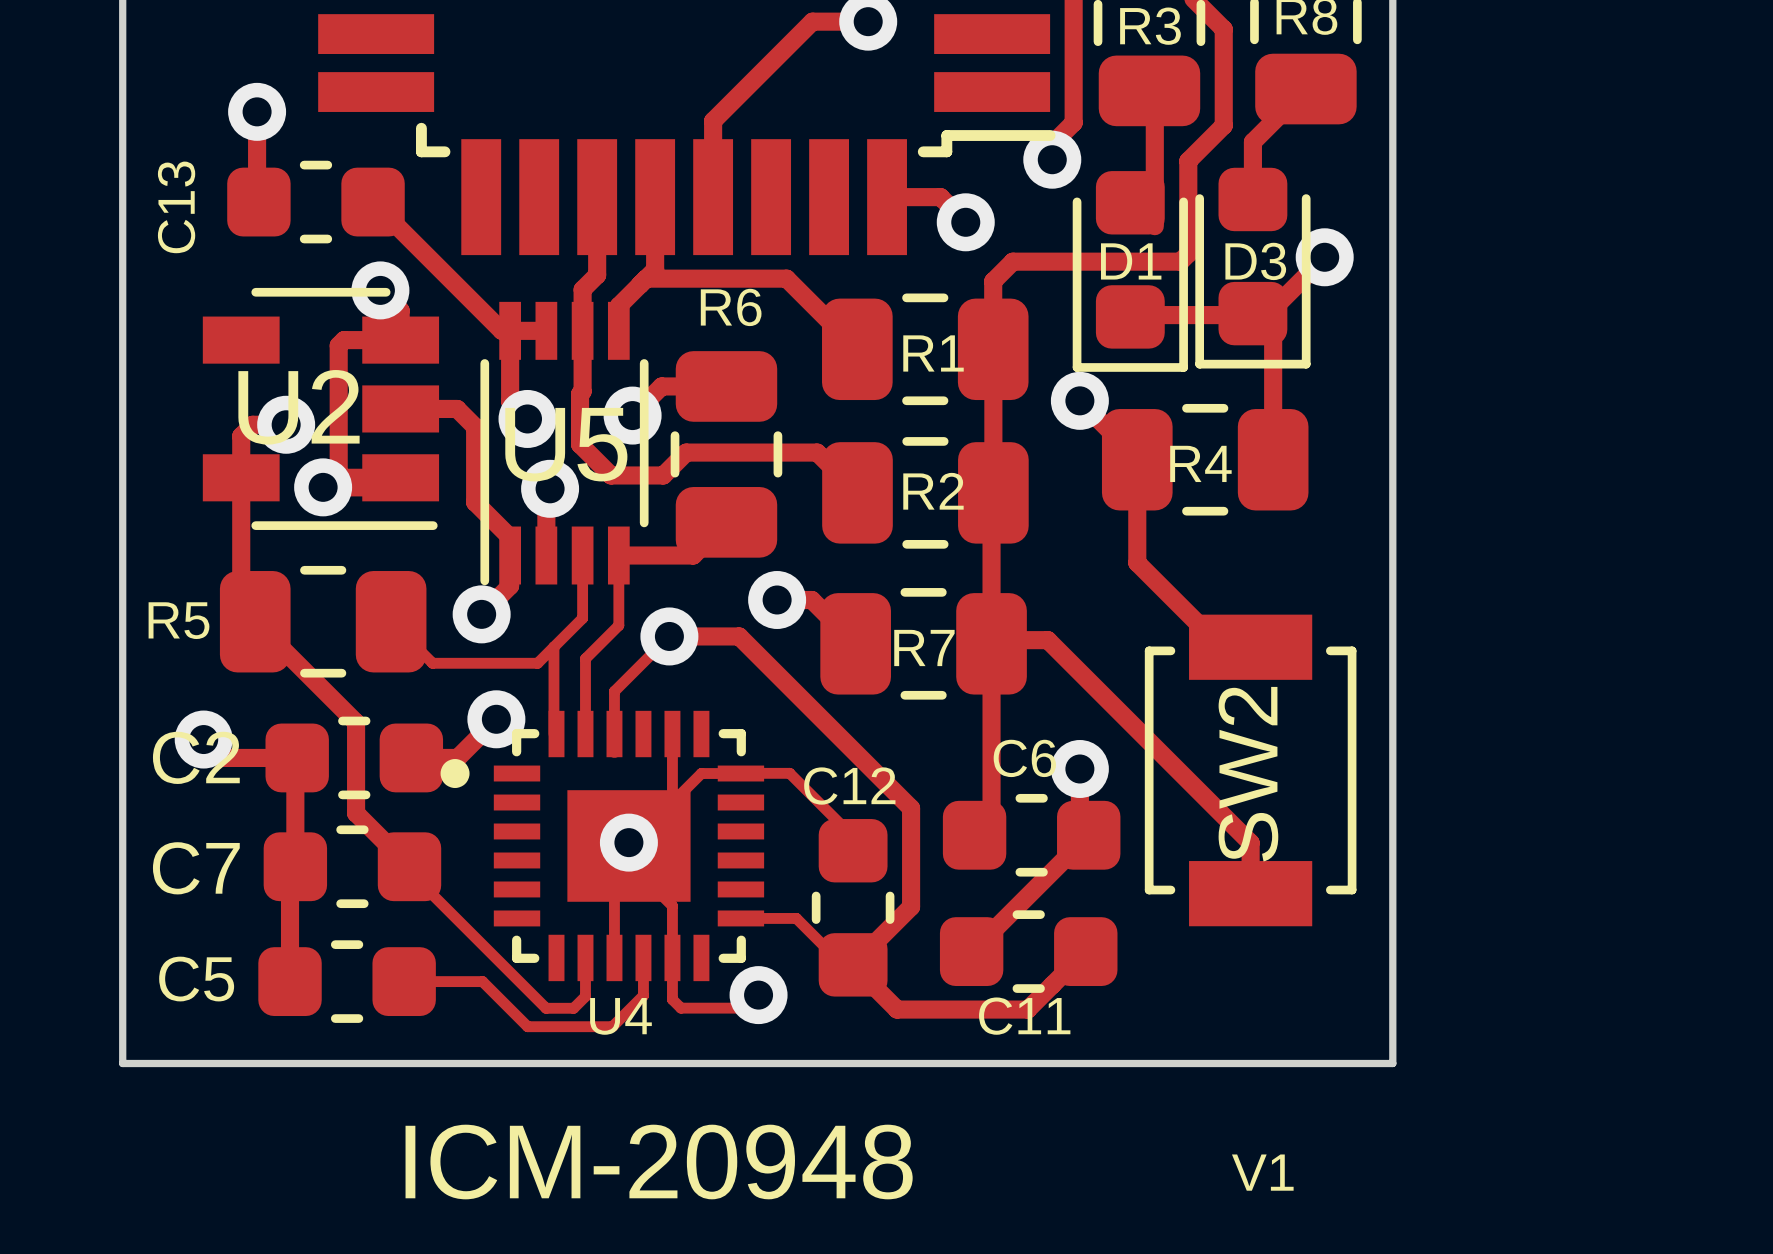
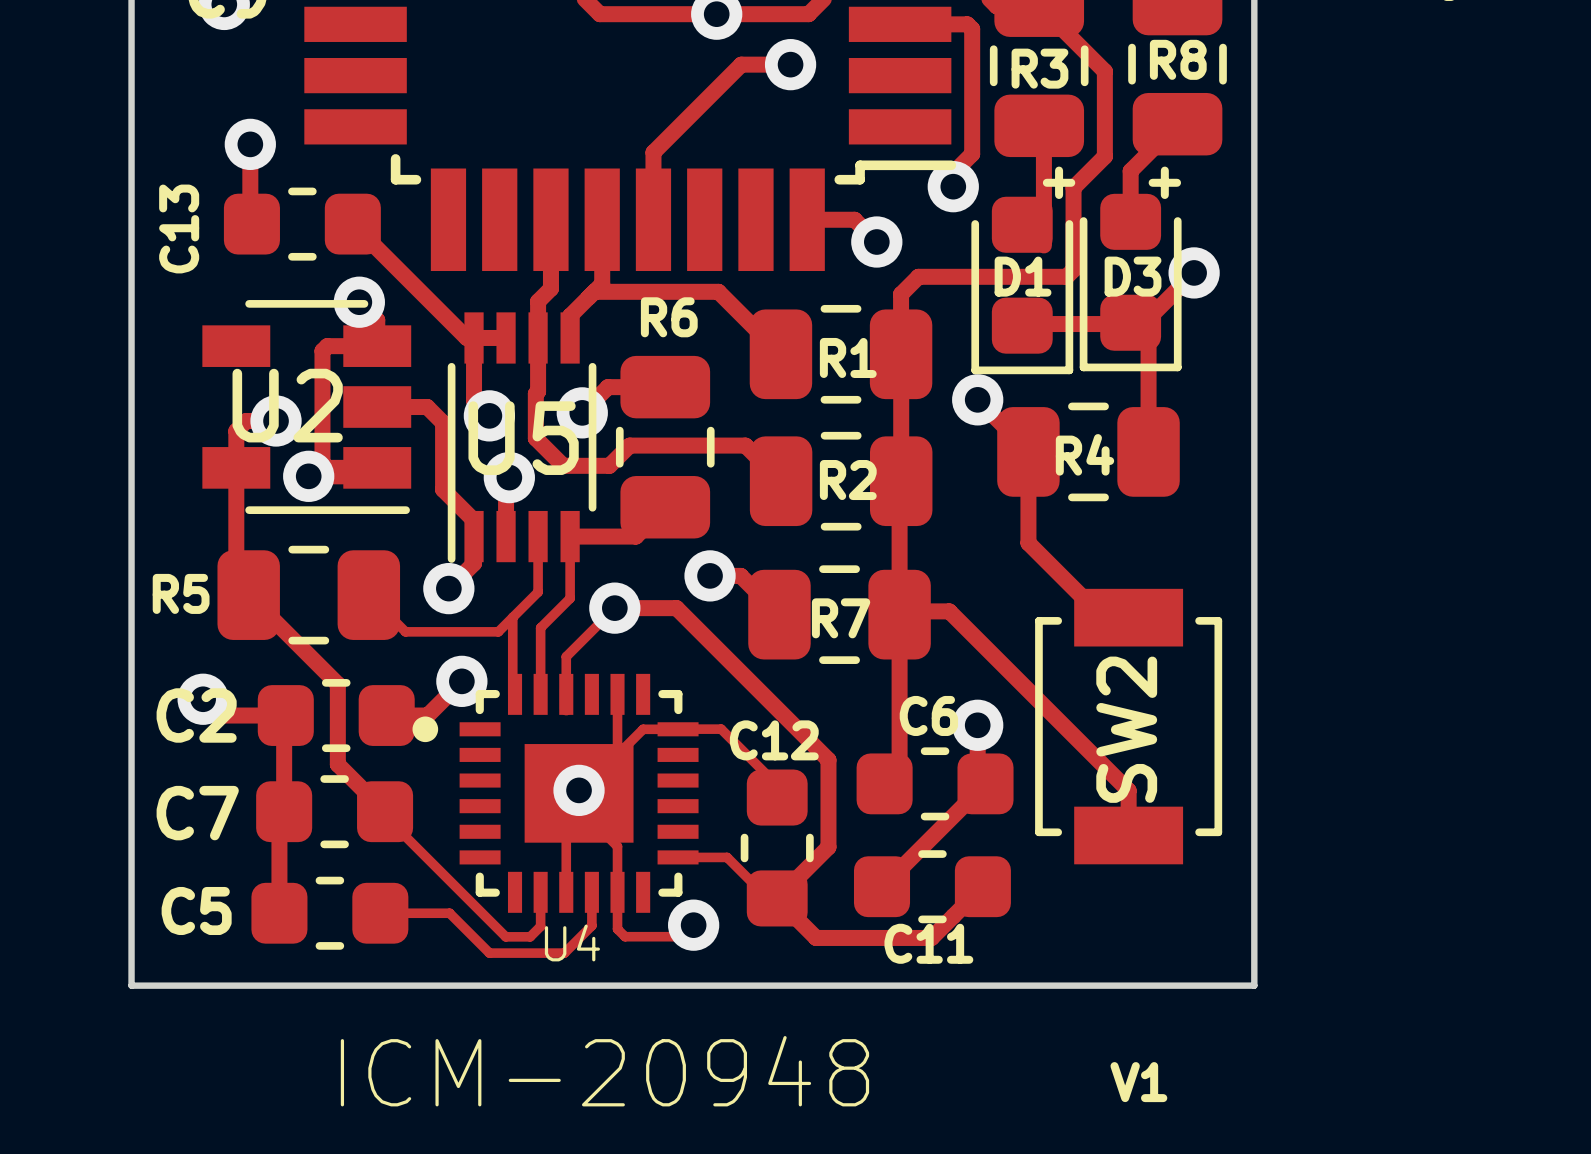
text: none -> + (1059, 182)
text: none -> + (1164, 182)

